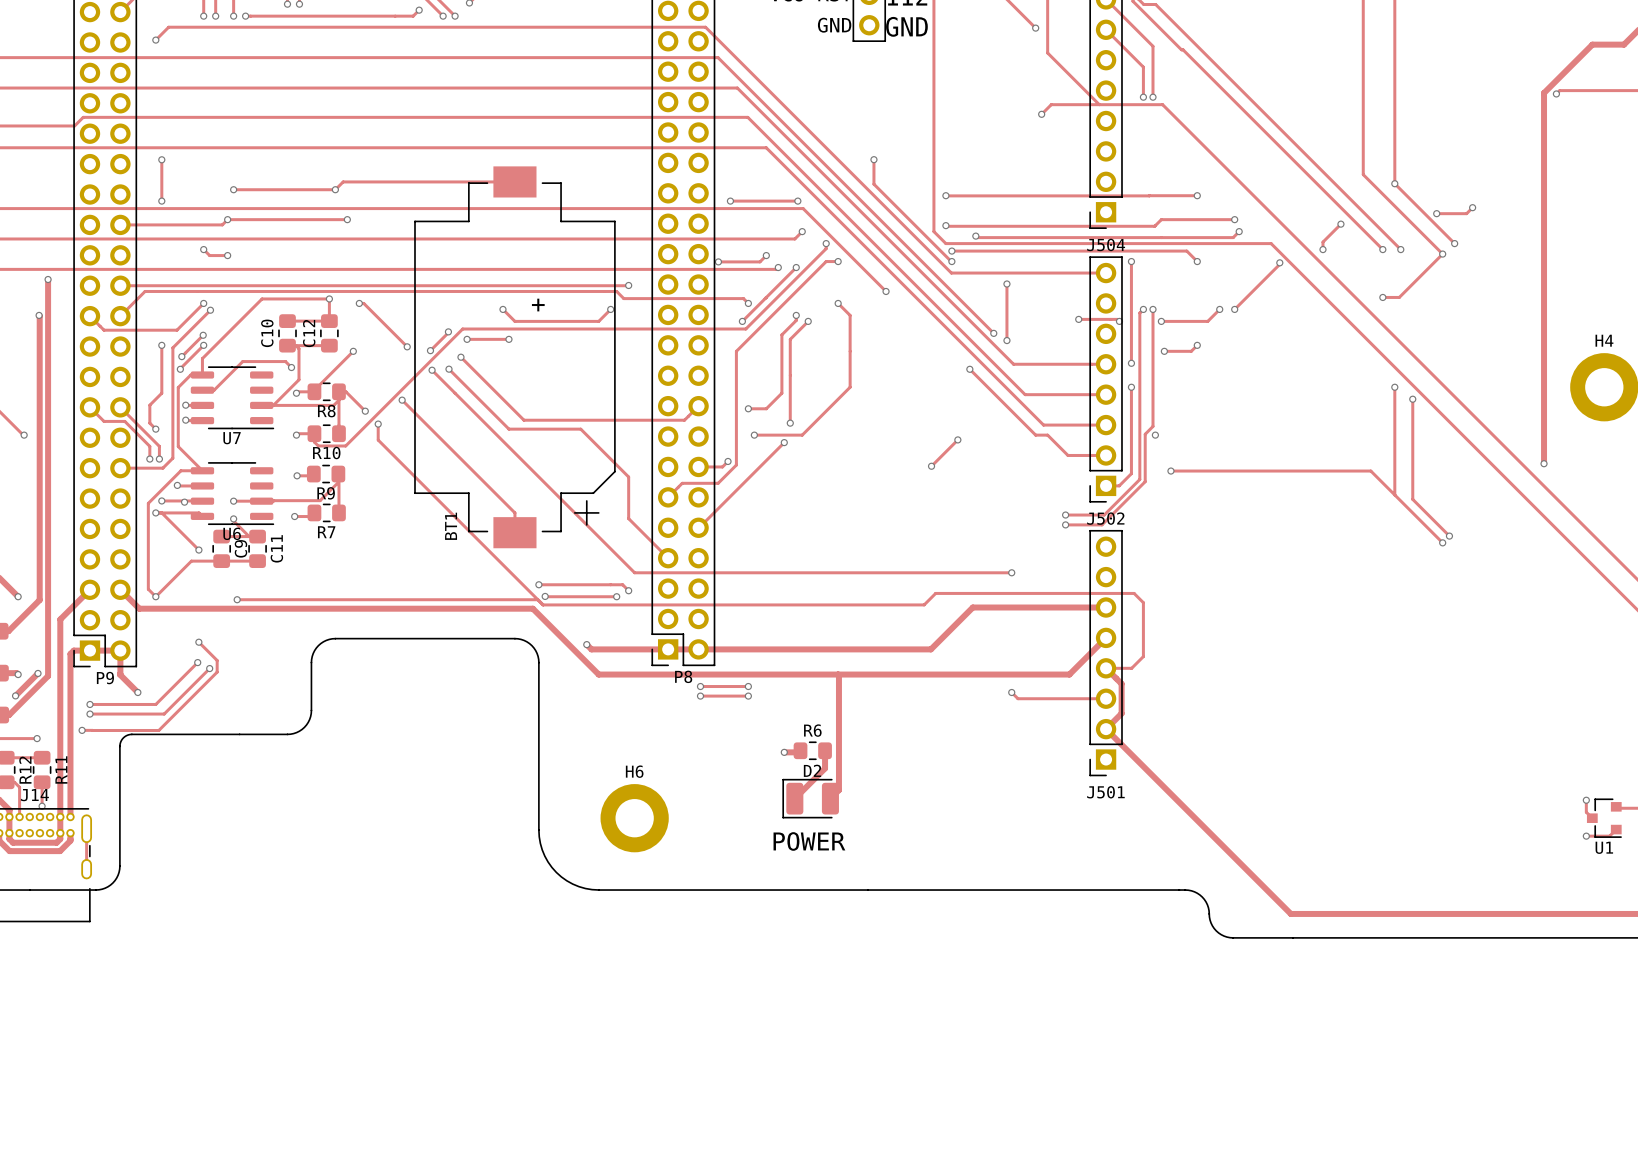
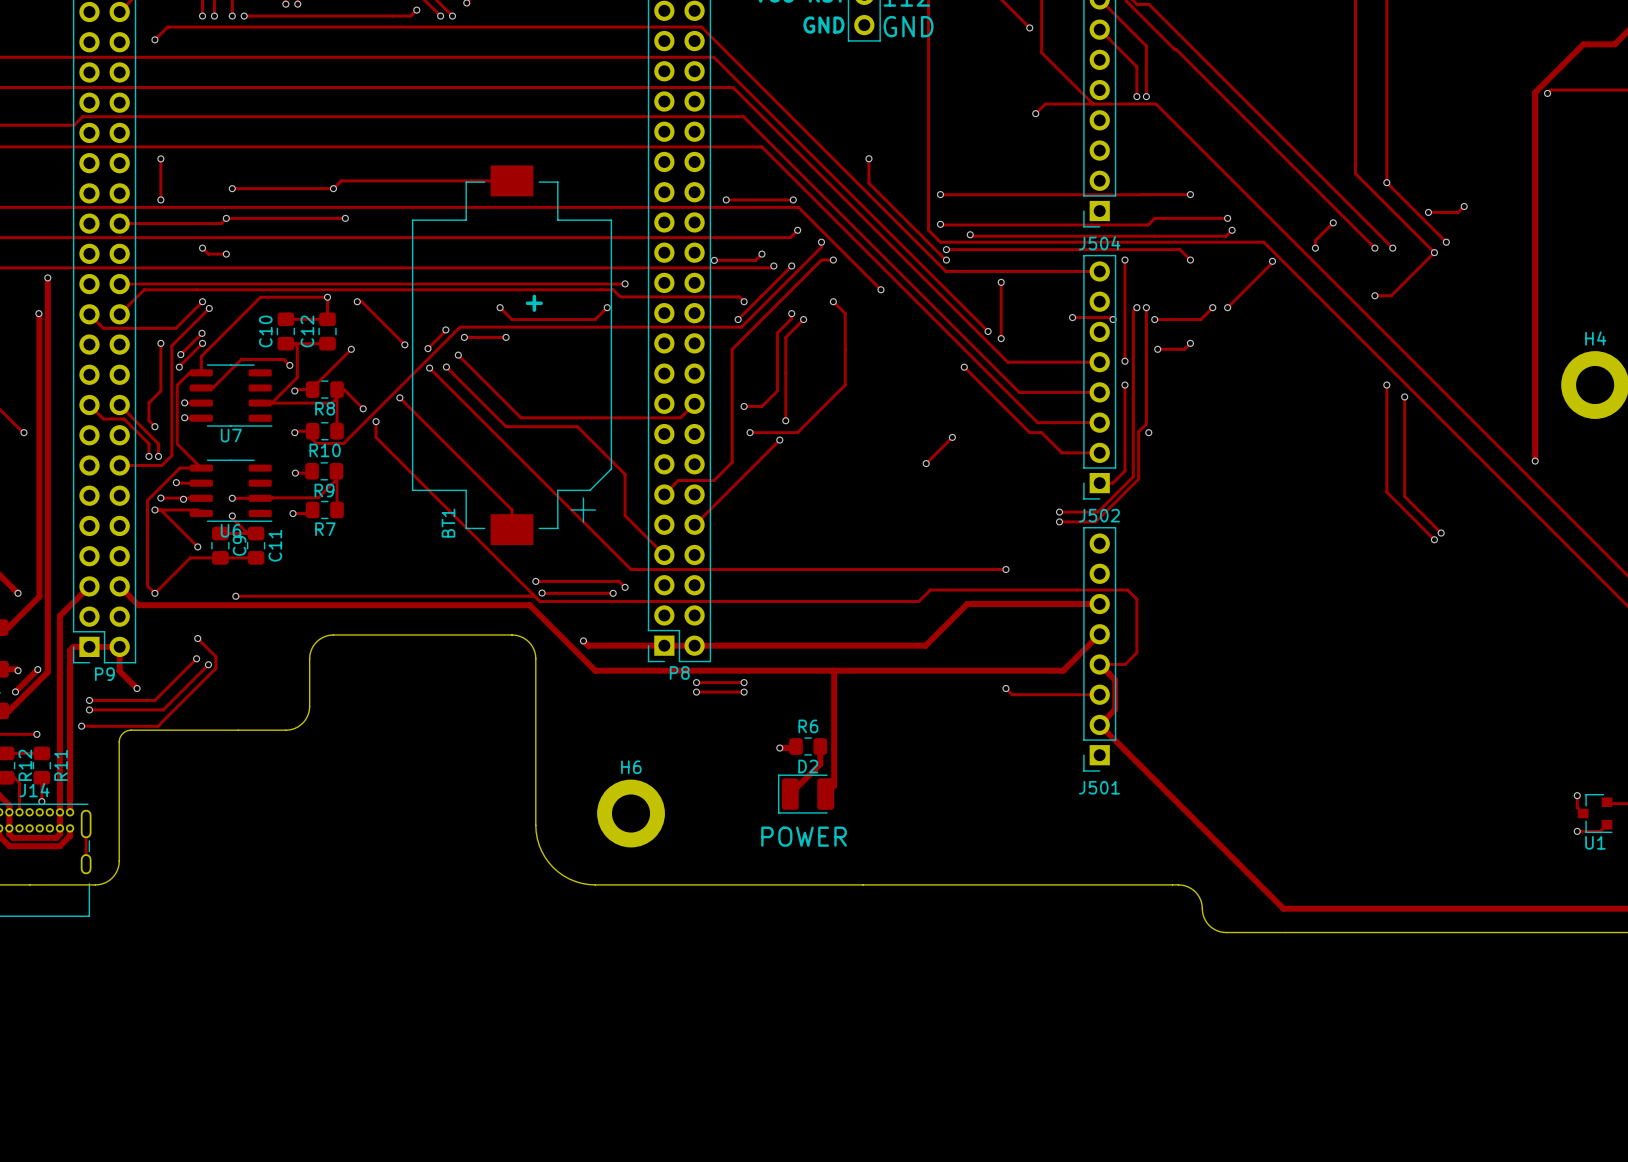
track: (728, 461) (722, 466) (698, 466) -> none
via: (728, 461) -> none
track: (1170, 471) (1370, 471) (1394, 494) -> none
via: (1170, 471) -> none

